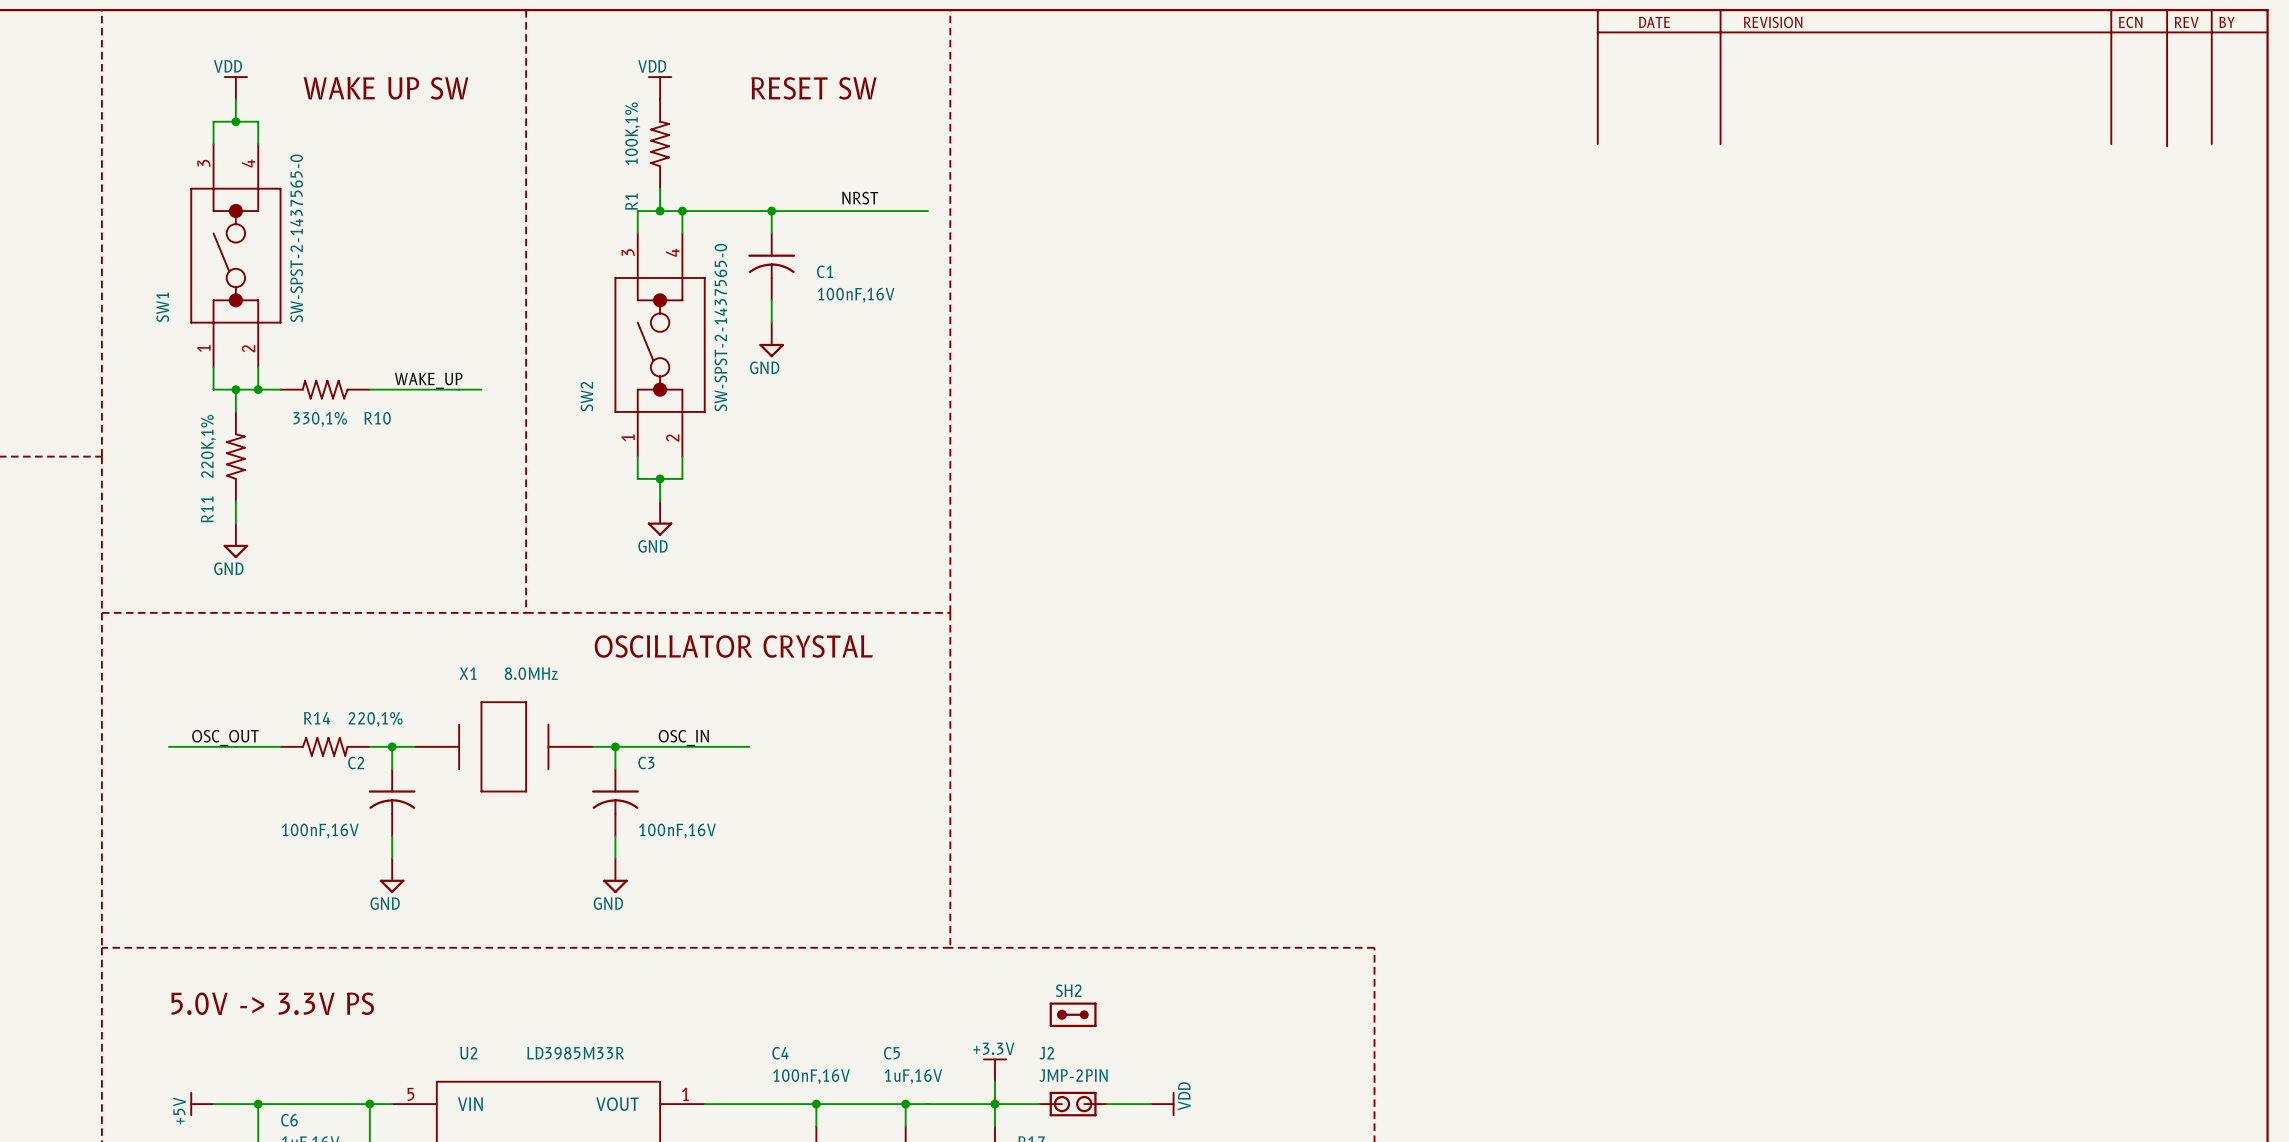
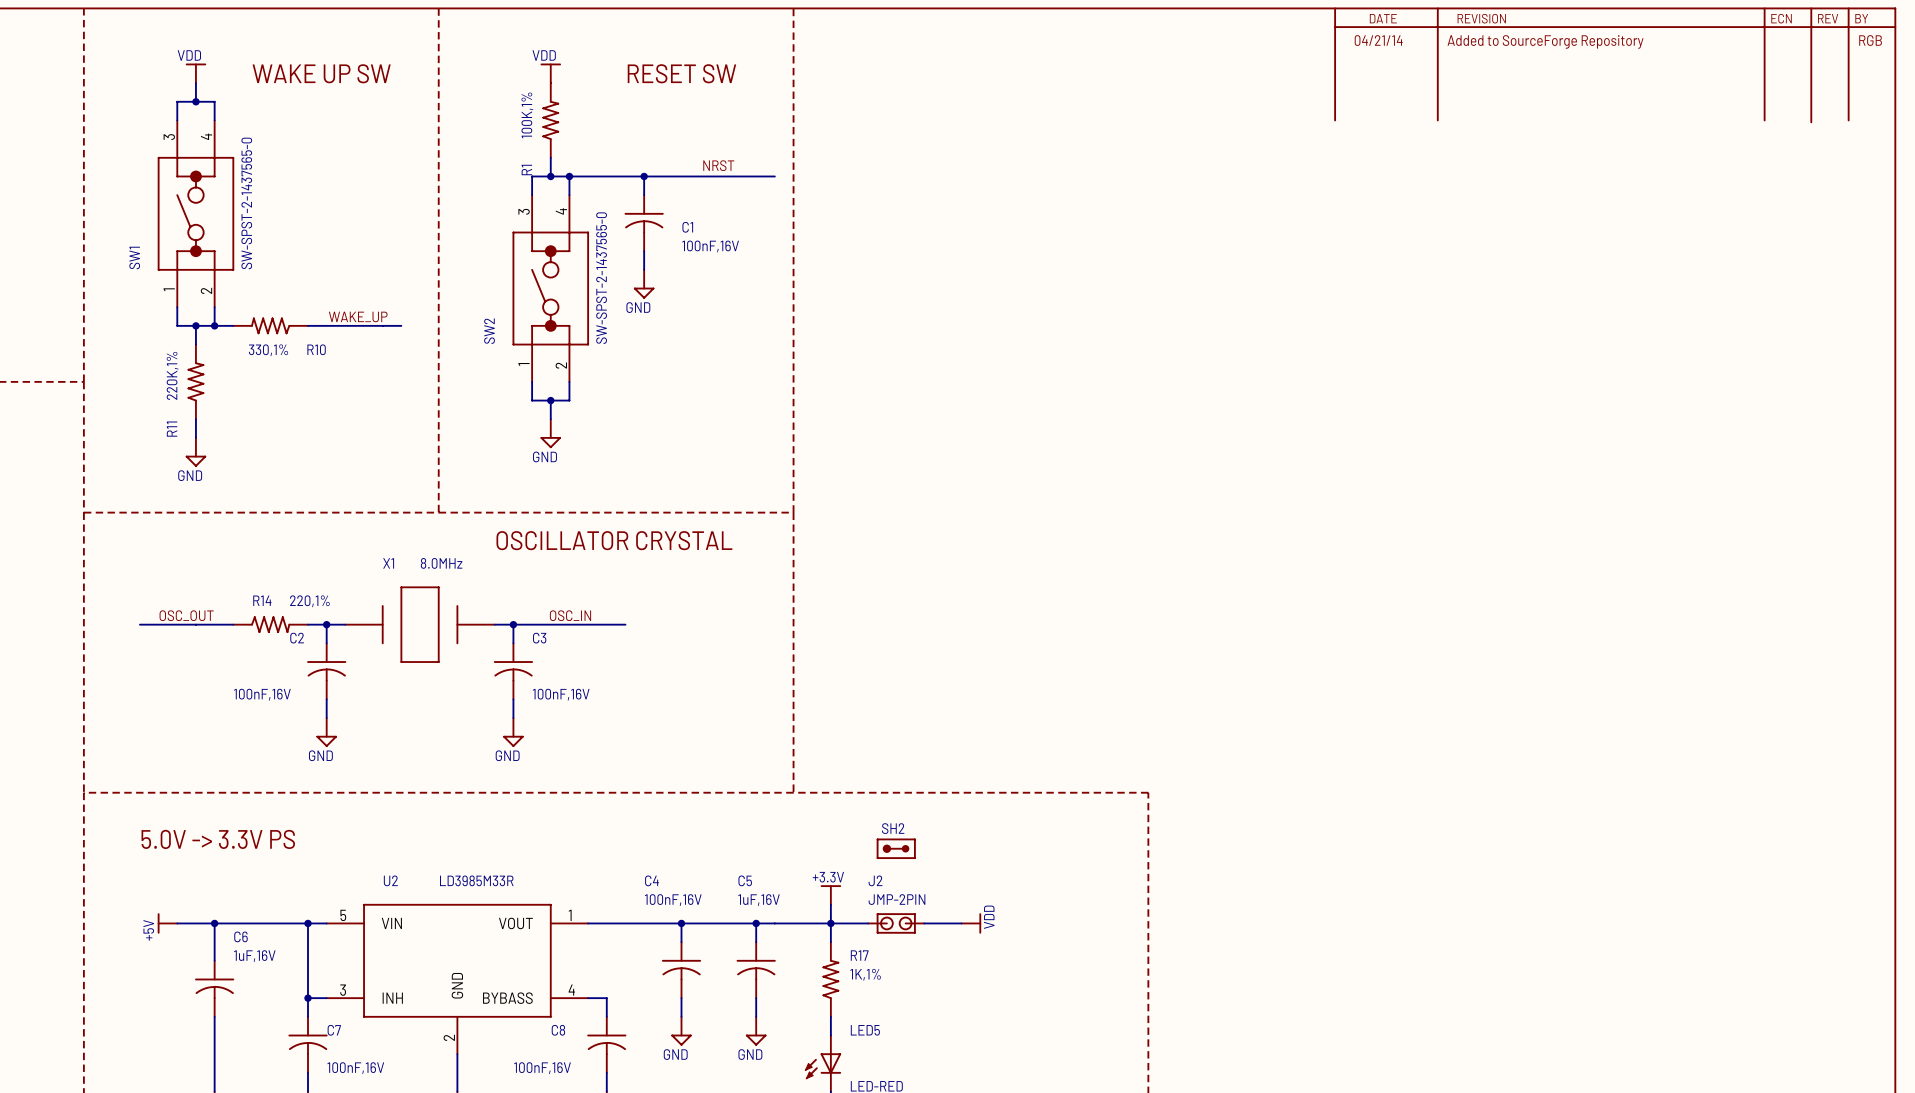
text: none -> 04/21/14 (1378, 40)
text: none -> RGB (1870, 40)
text: none -> Added to SourceForge Repository (1545, 41)

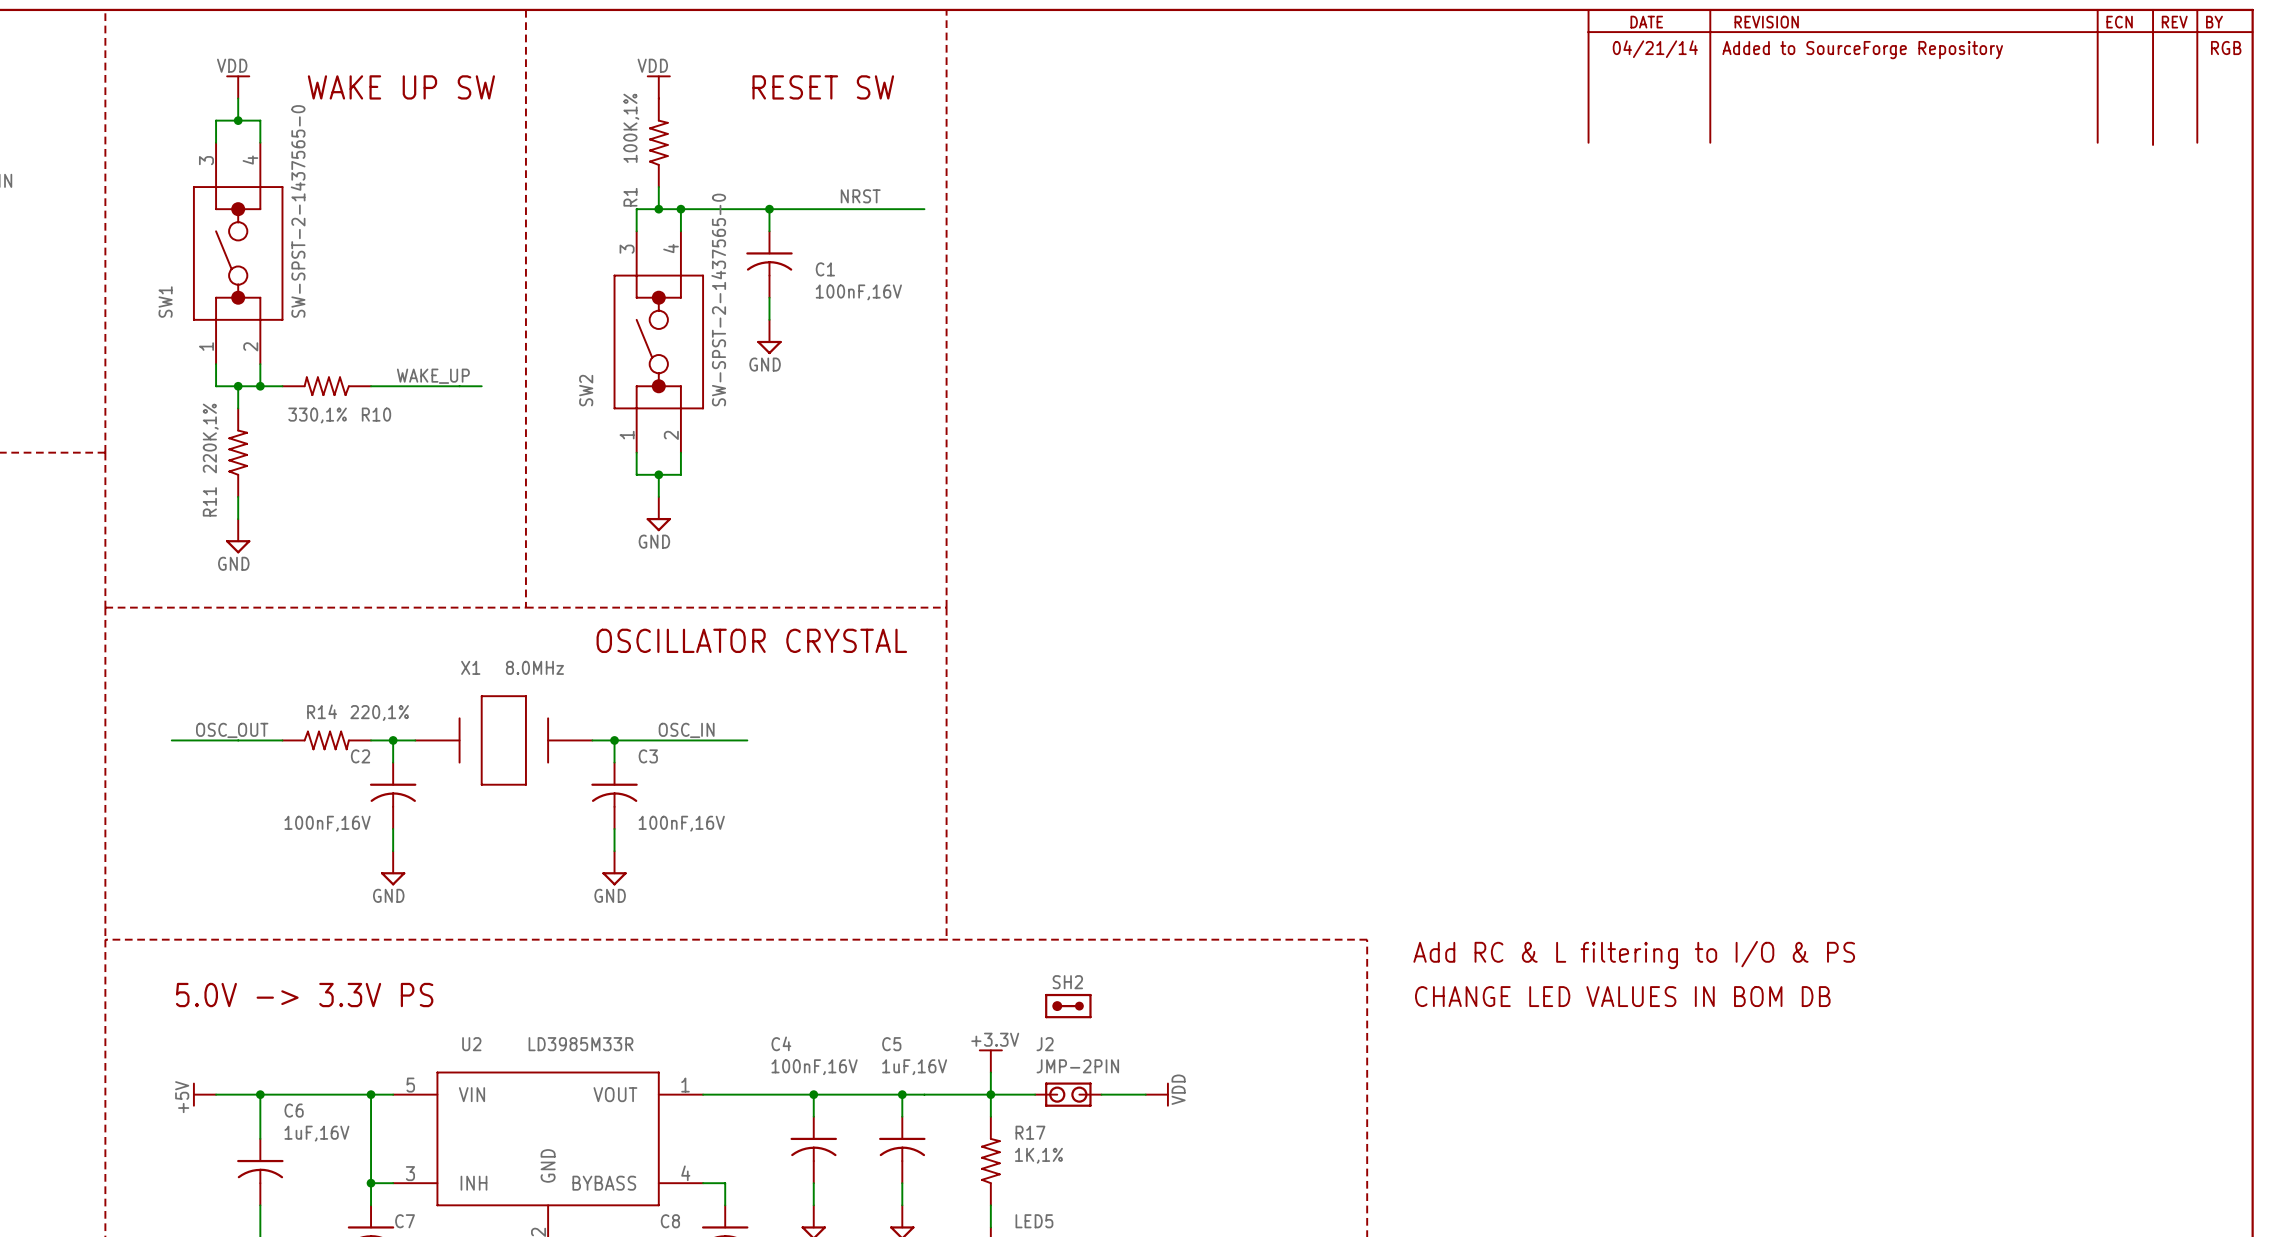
text: none -> Add RC & L filtering to I/O & PS (1634, 955)
text: none -> CHANGE LED VALUES IN BOM DB (1622, 996)

